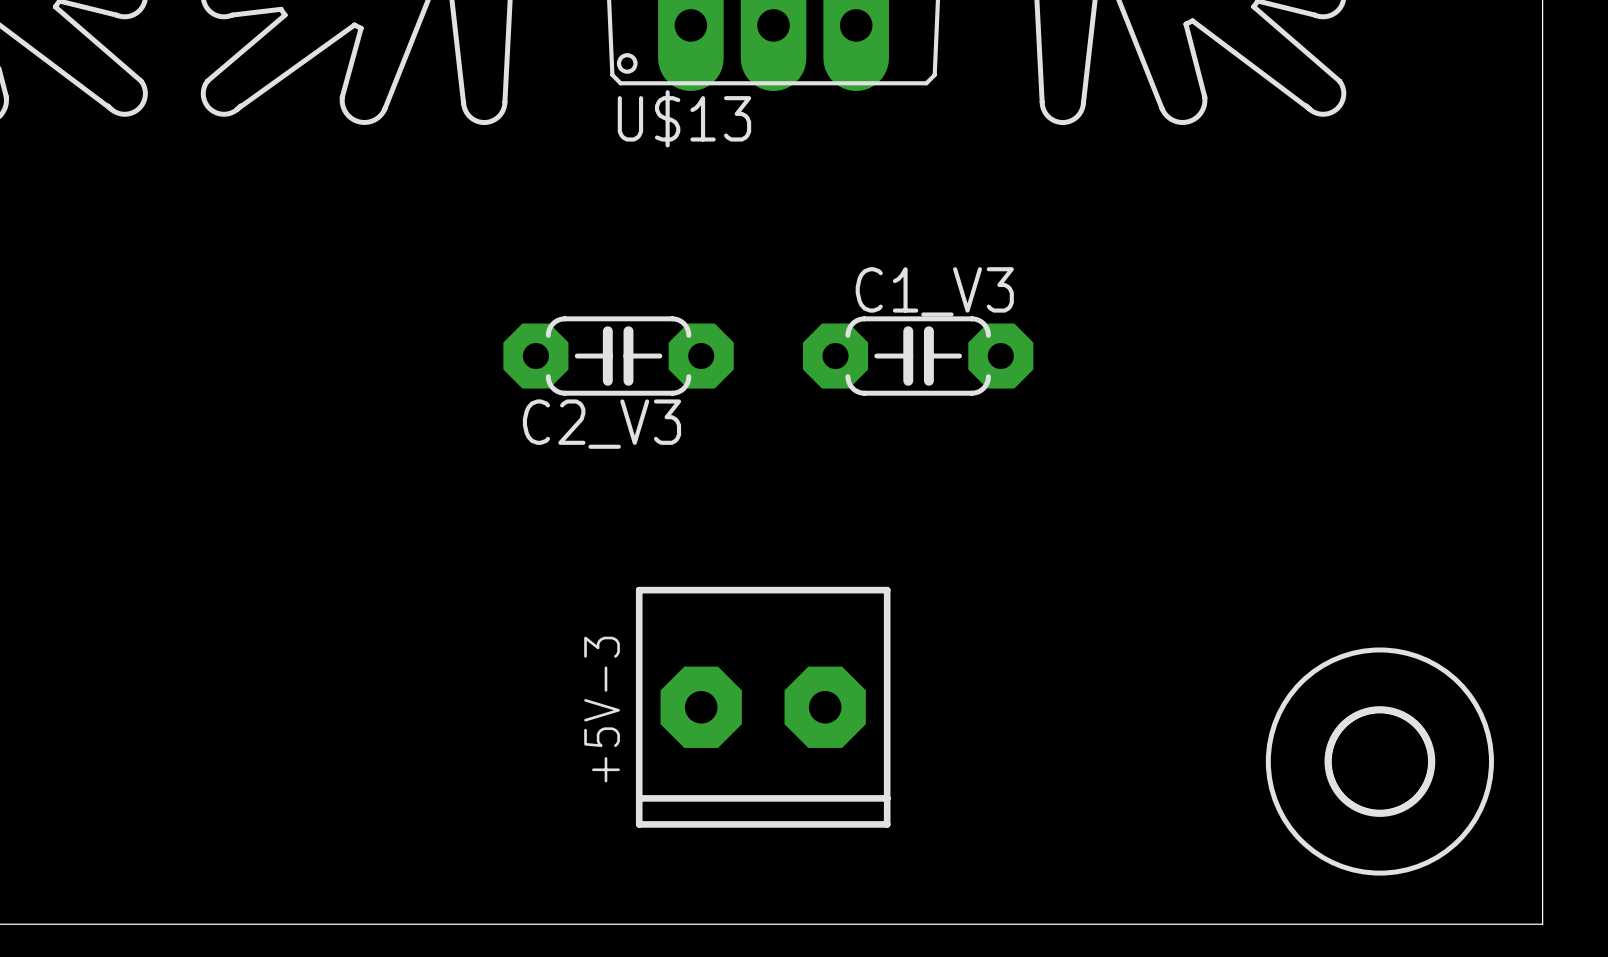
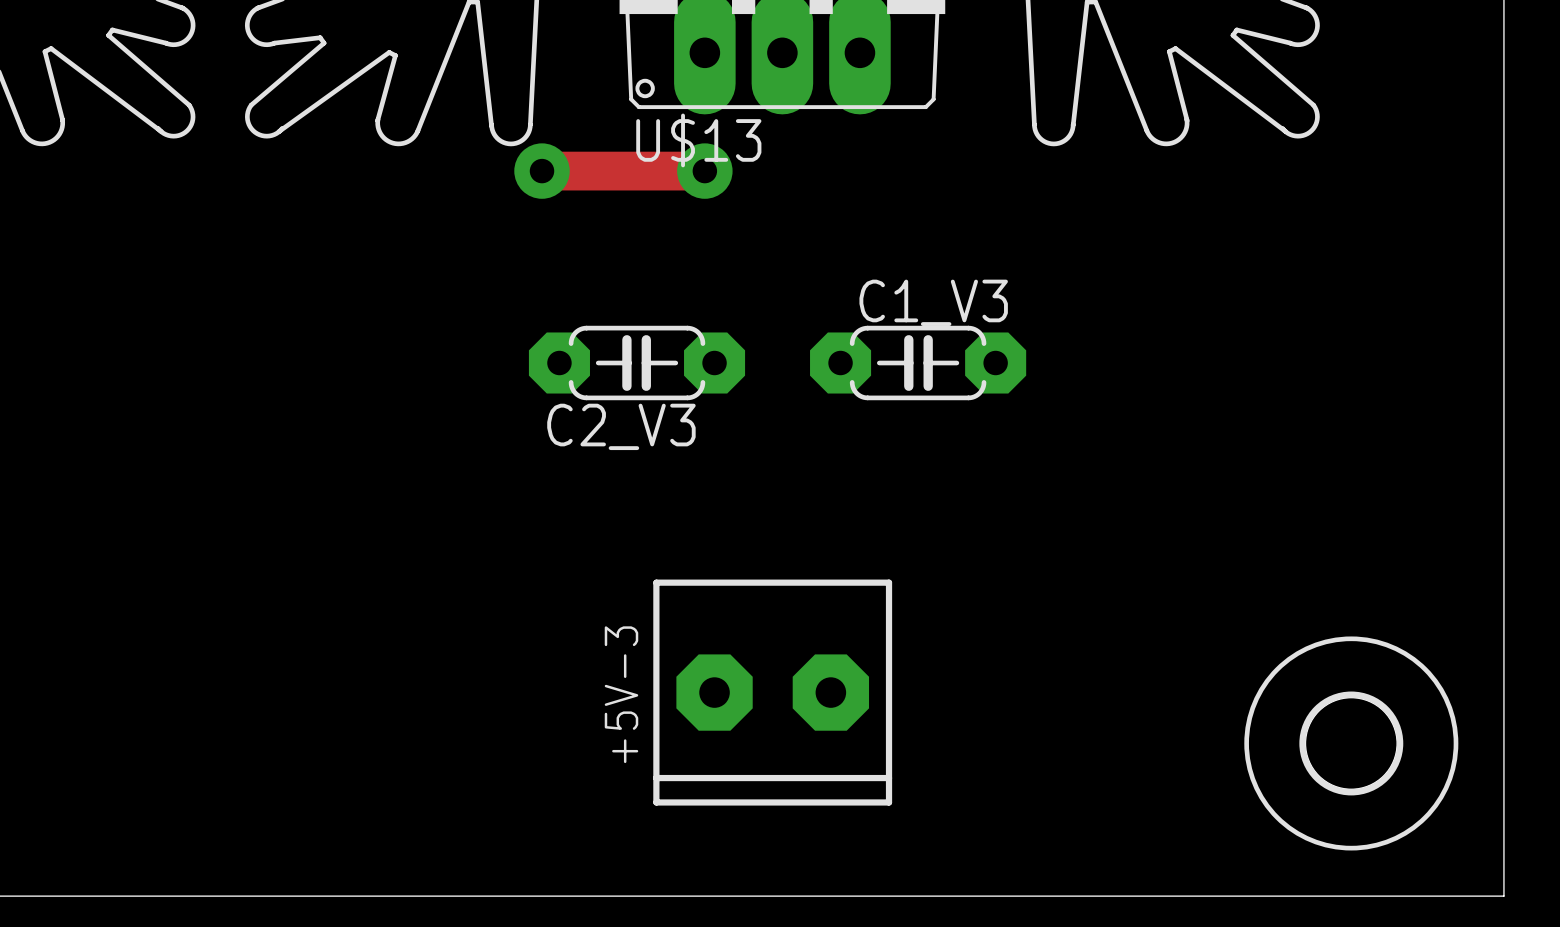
track: none -> (542, 171) (704, 171)
via: none -> (542, 171)
via: none -> (704, 171)

